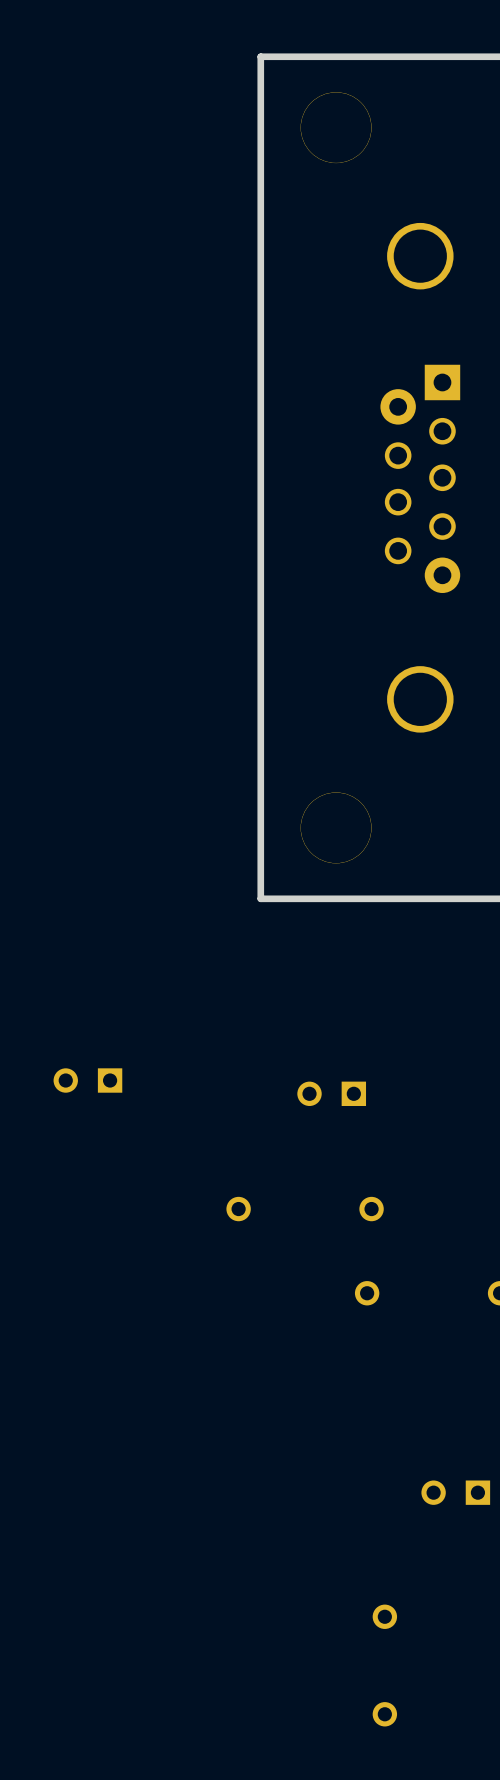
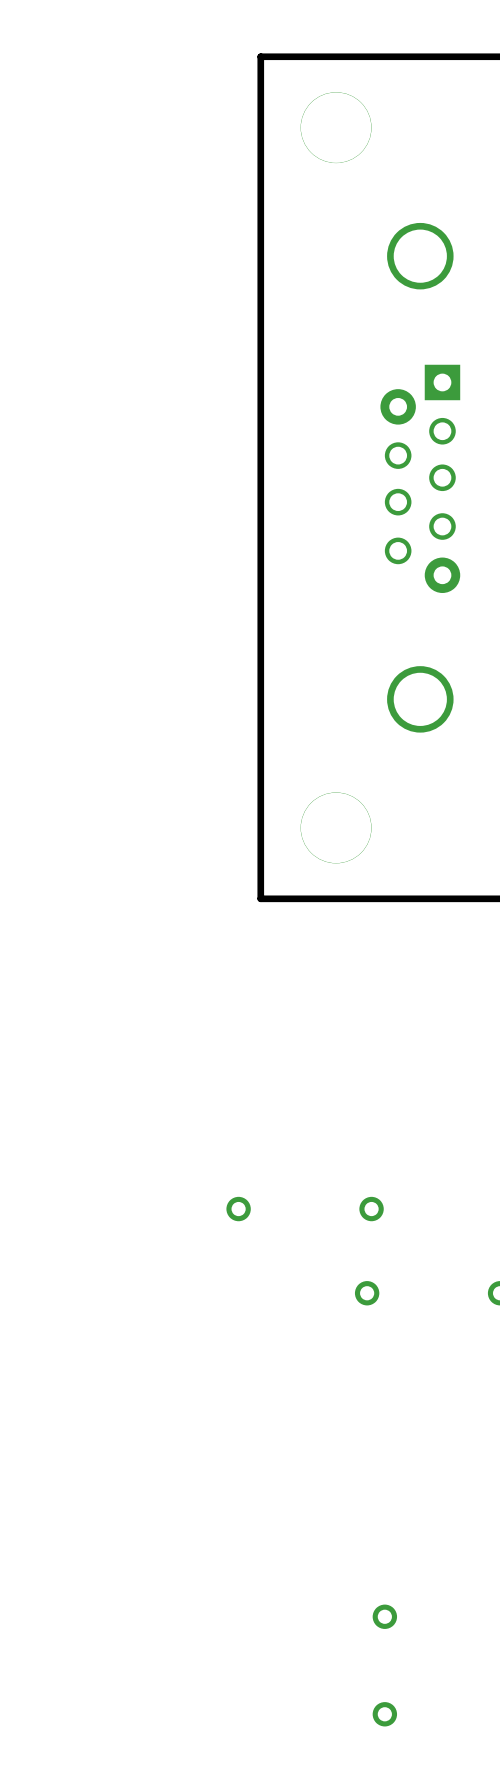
part: (87, 1080) -> none
part: (331, 1093) -> none
part: (455, 1492) -> none

